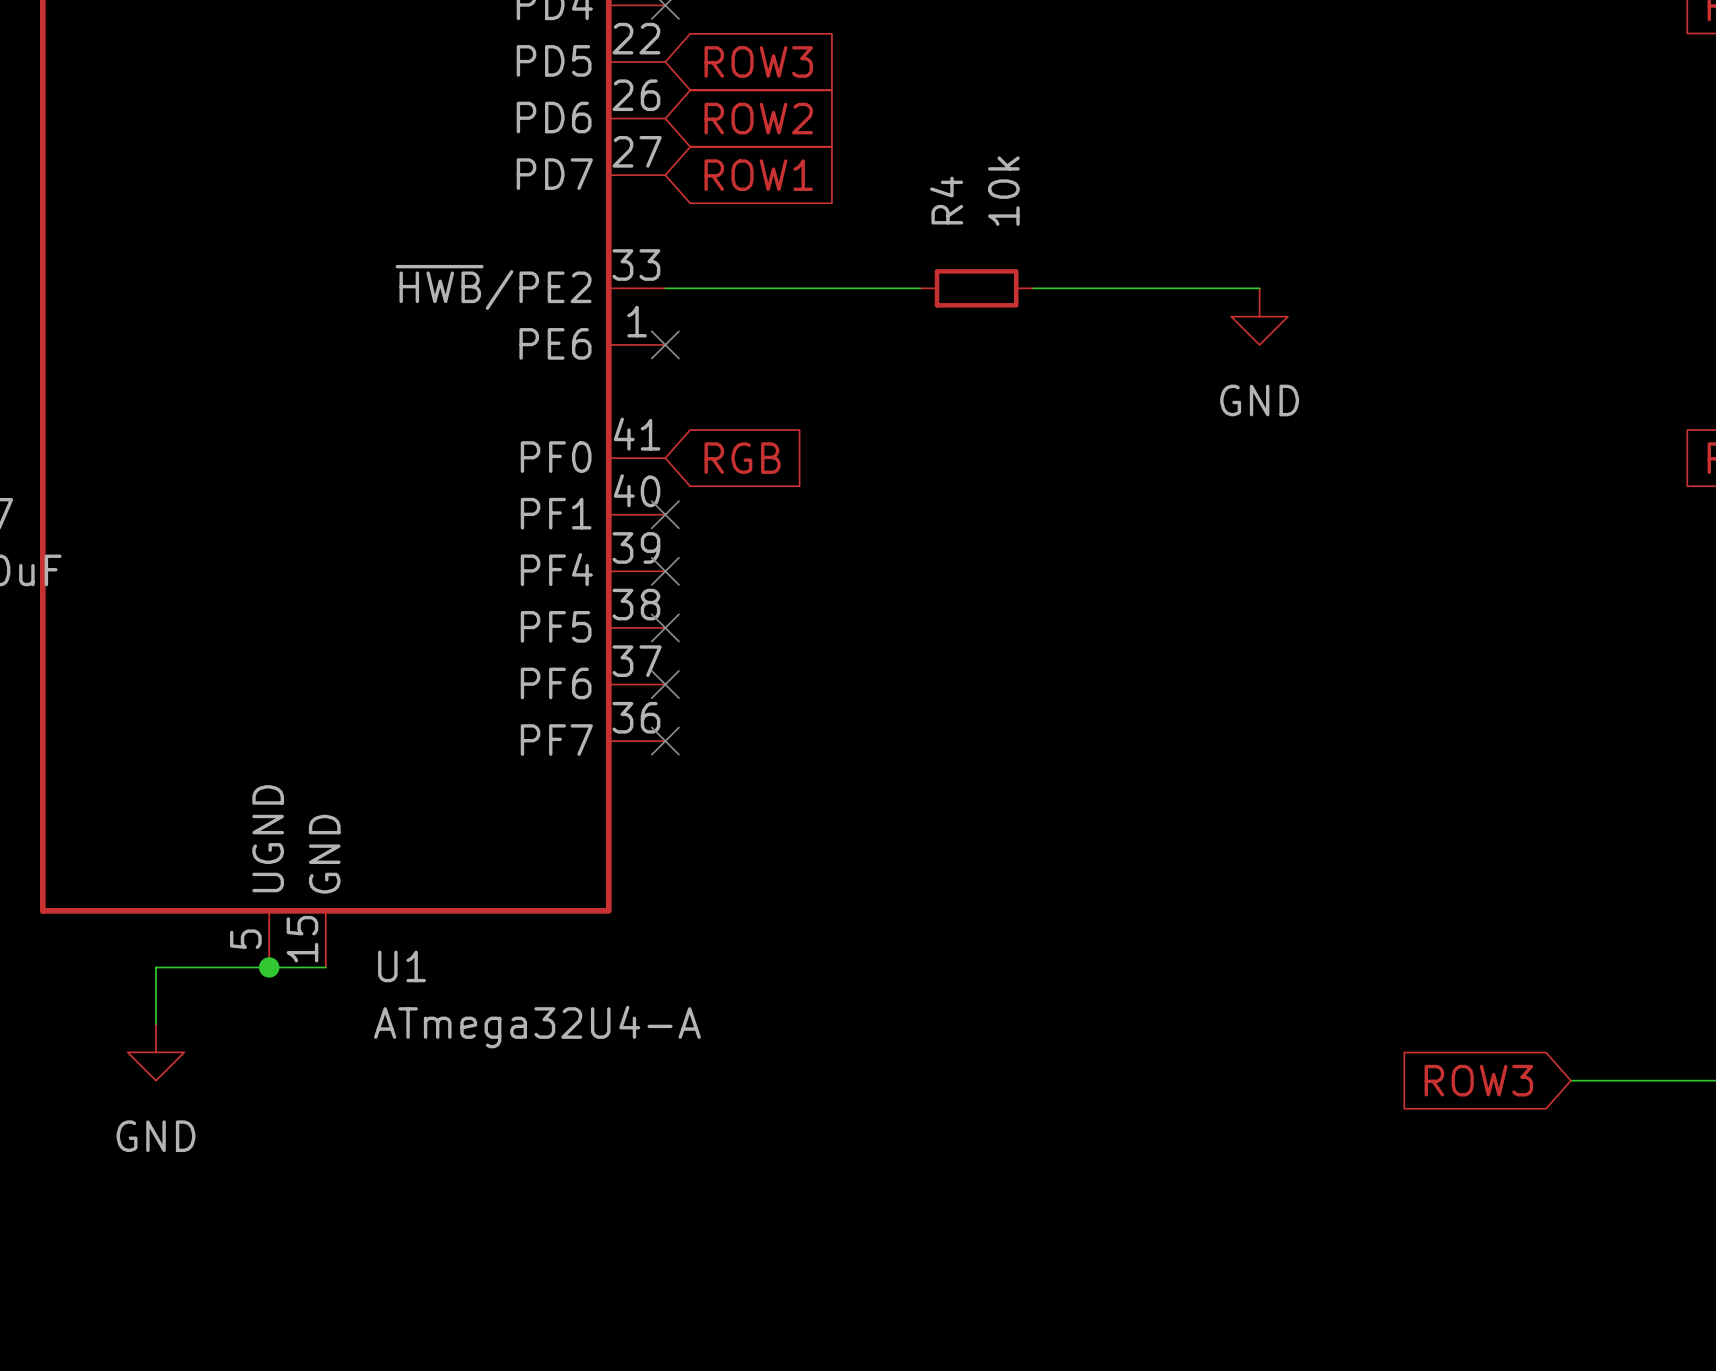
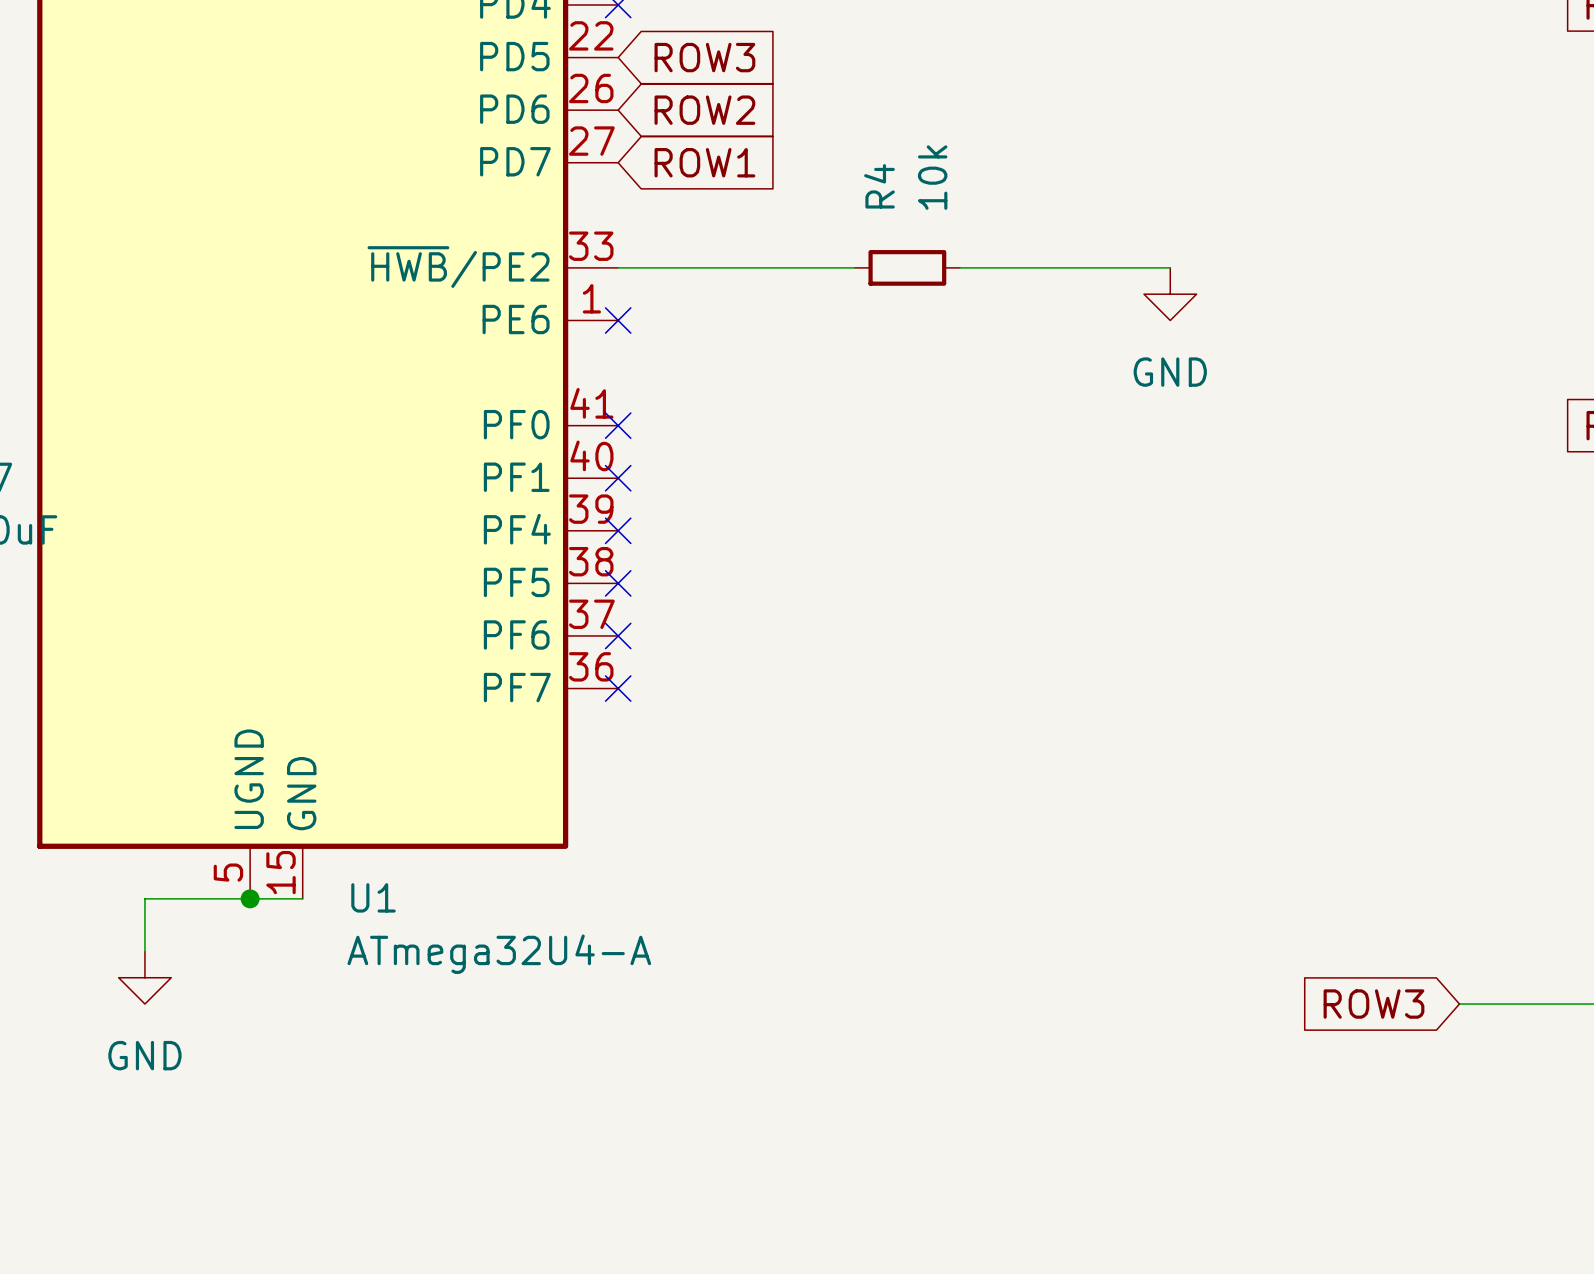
no-connect mark: none -> (618, 425)
global label: RGB (742, 458) -> none

